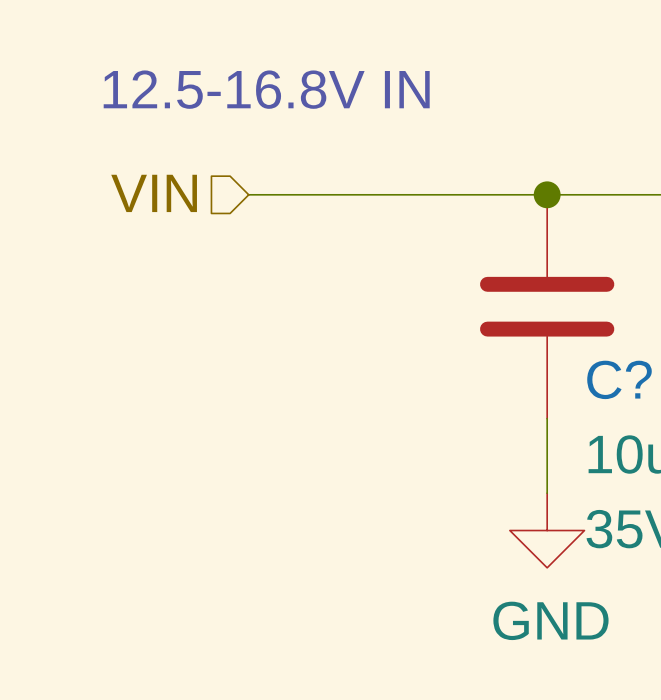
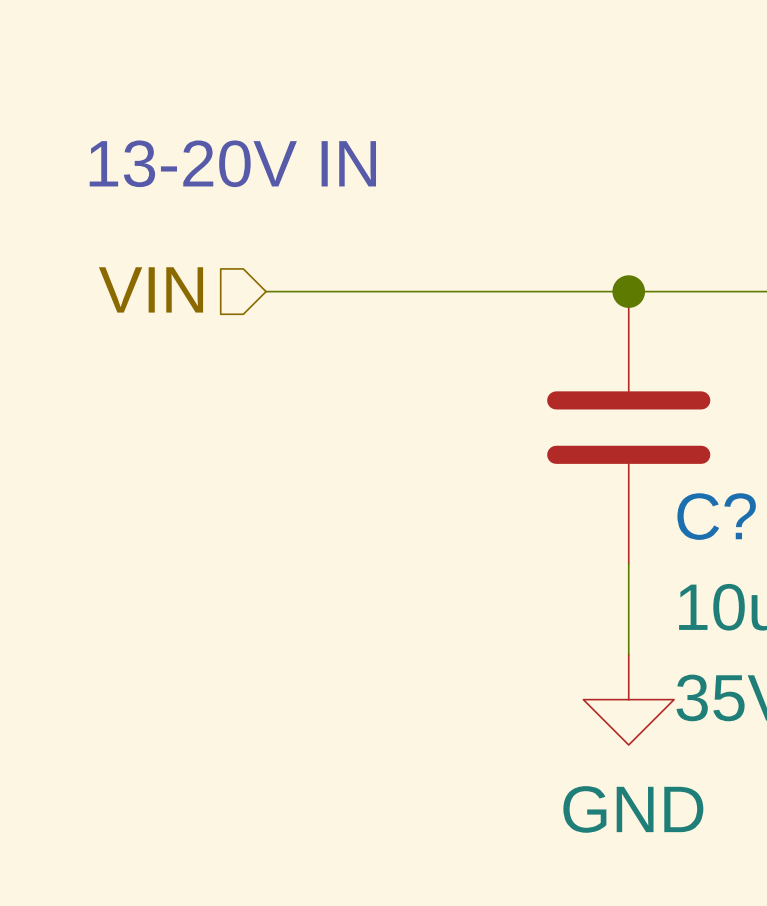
text: 12.5-16.8V IN (266, 89) -> 13-20V IN (232, 163)

